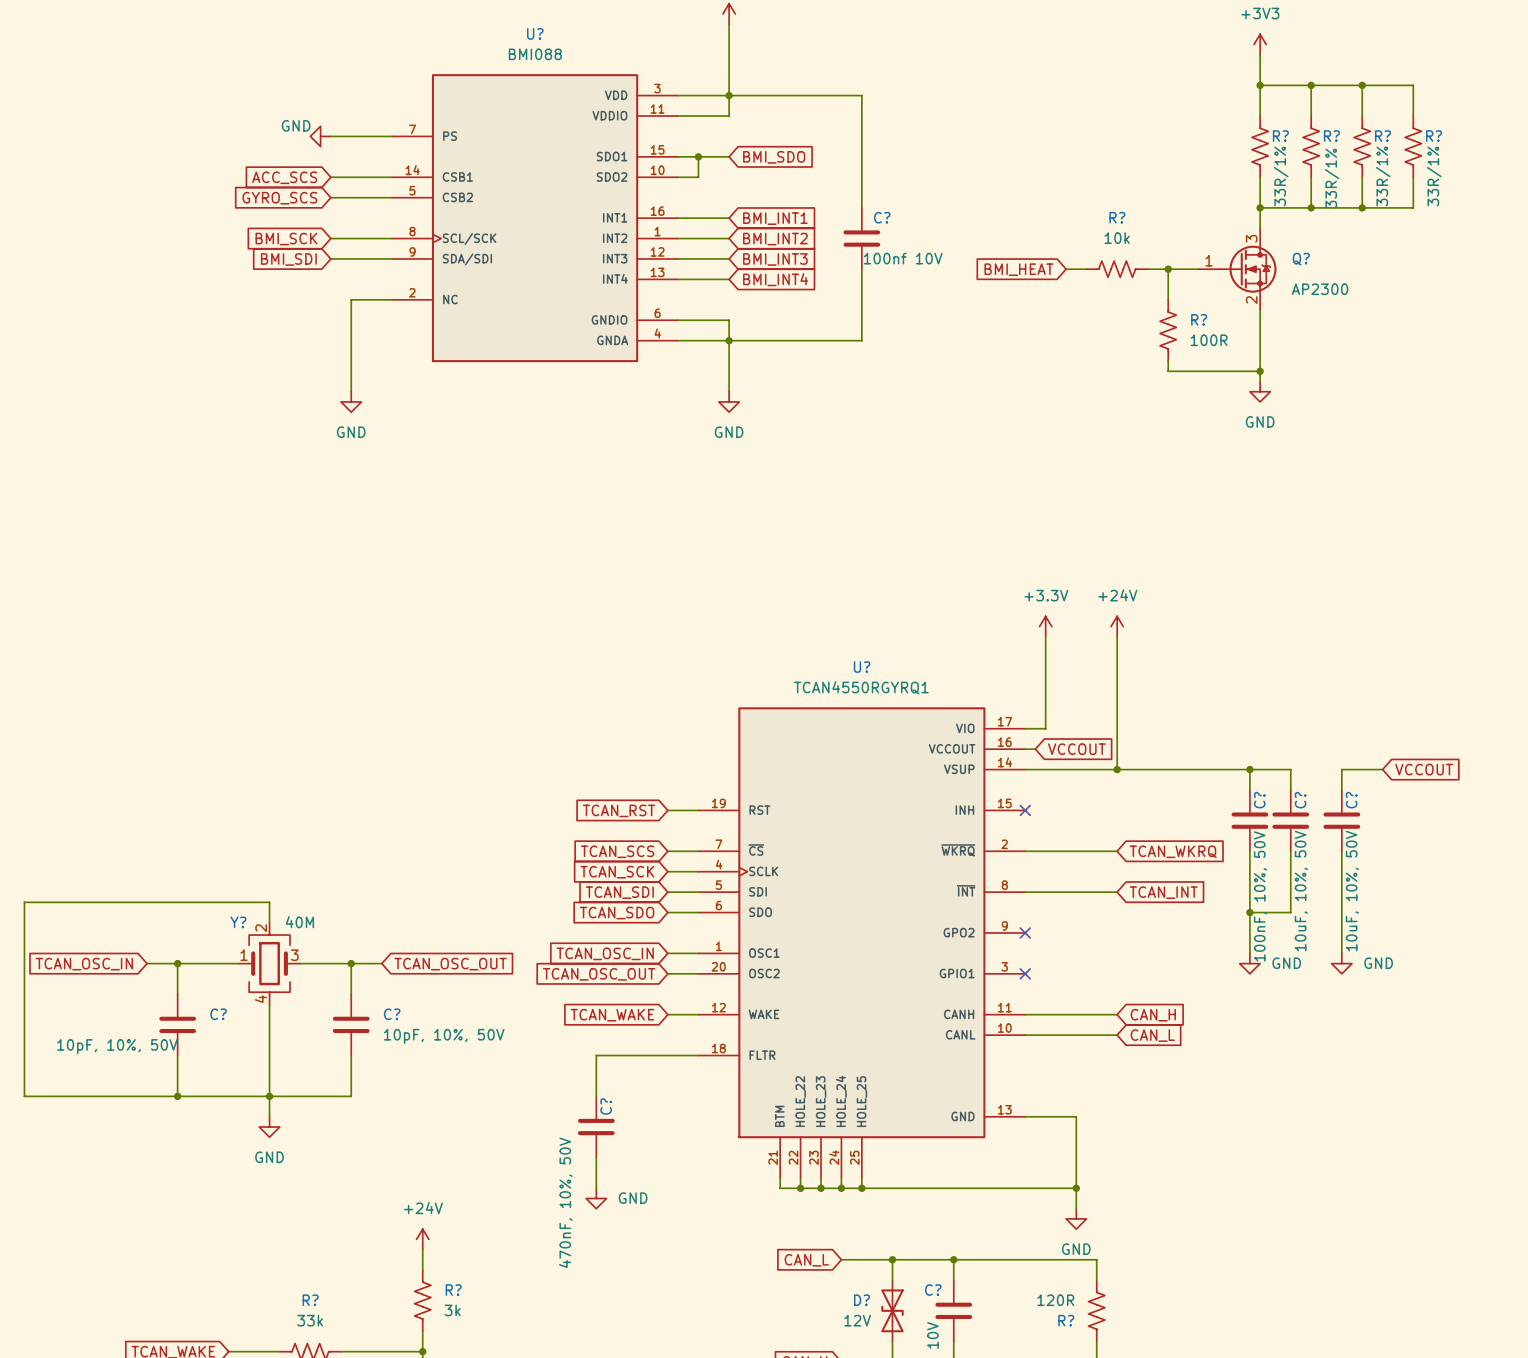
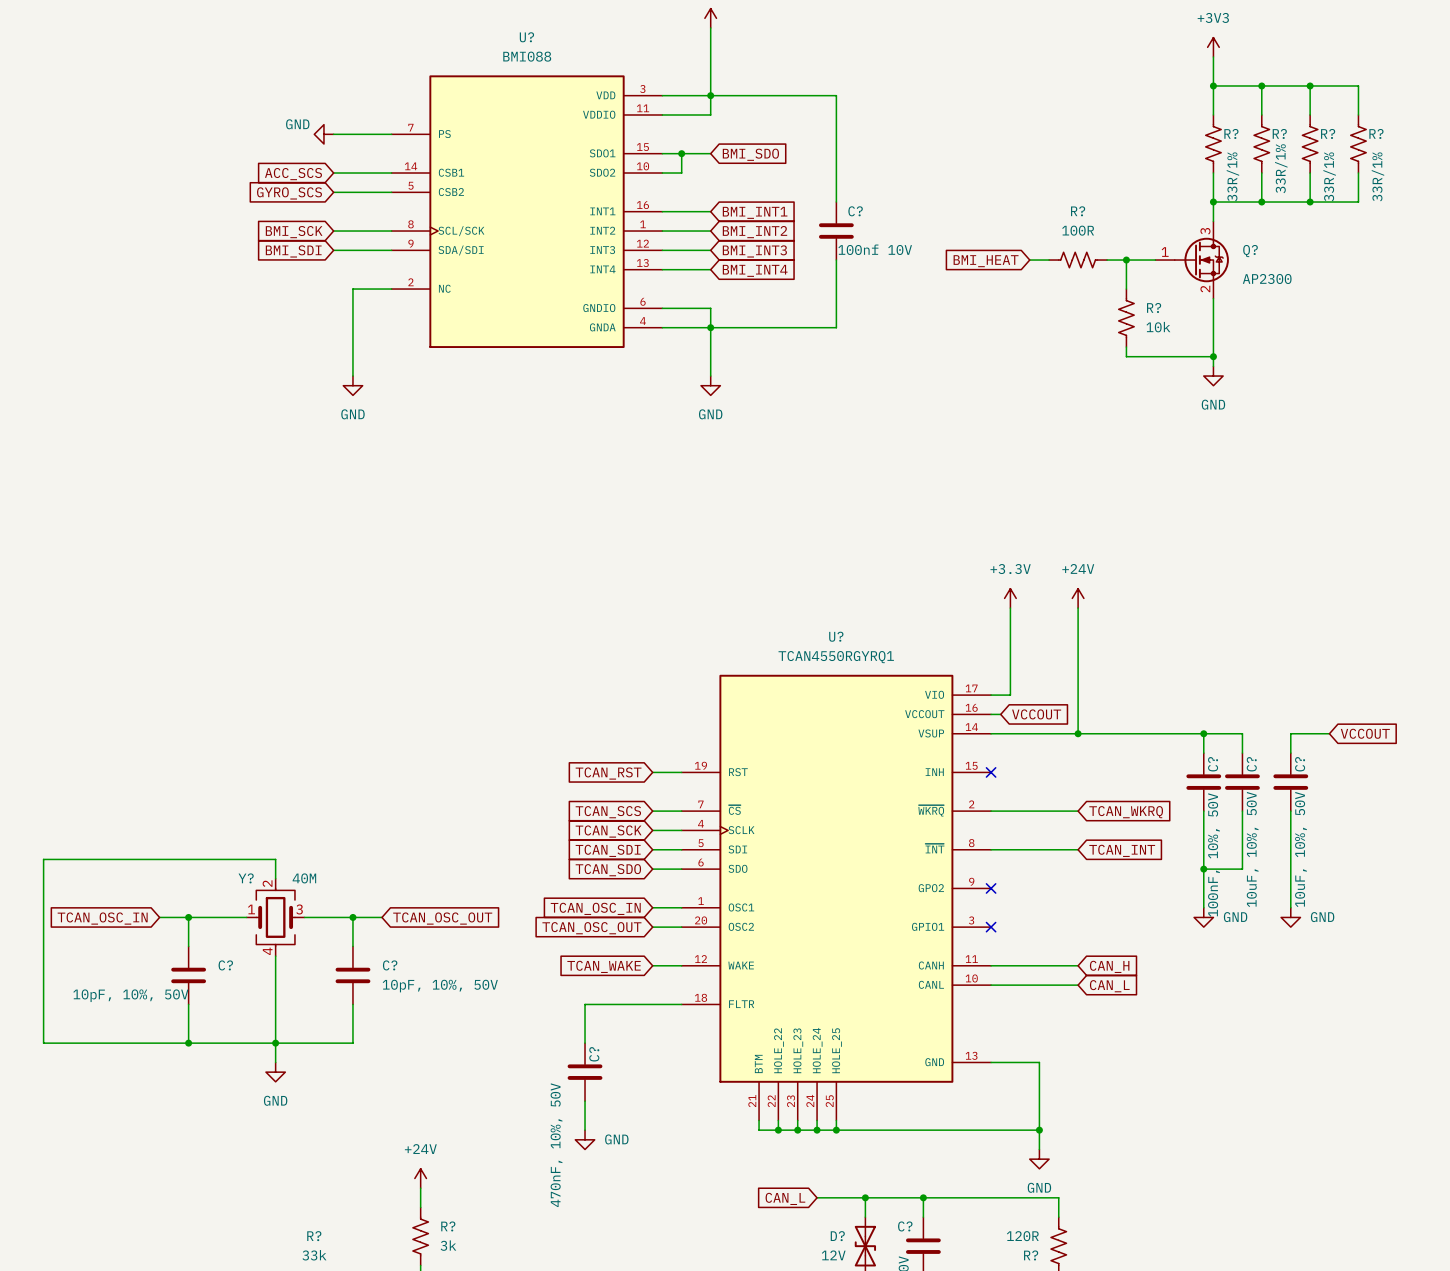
R? value: 10k (1117, 238) -> 100R (1078, 230)
R? value: 100R (1209, 340) -> 10k (1158, 327)

